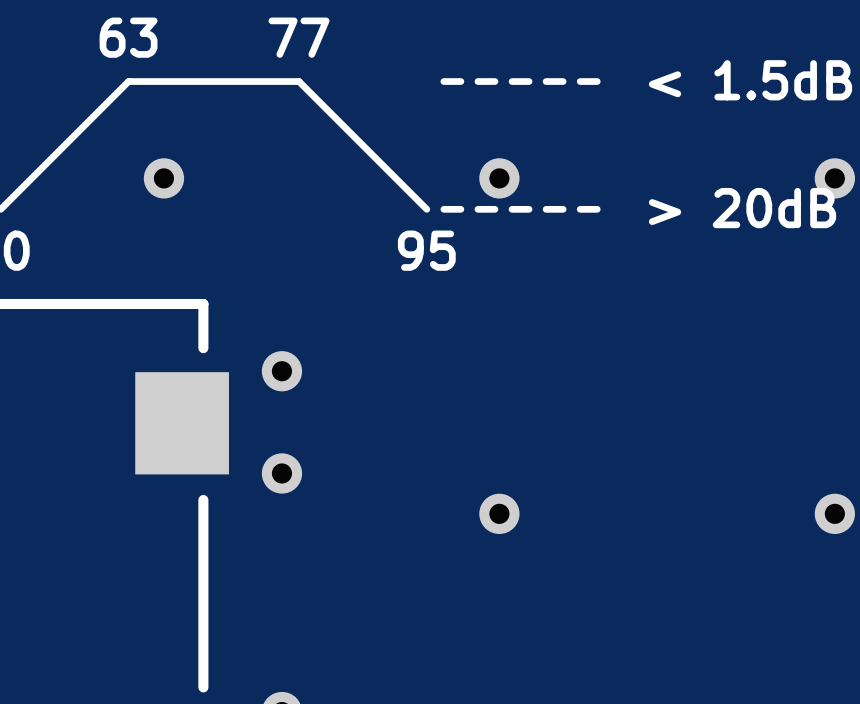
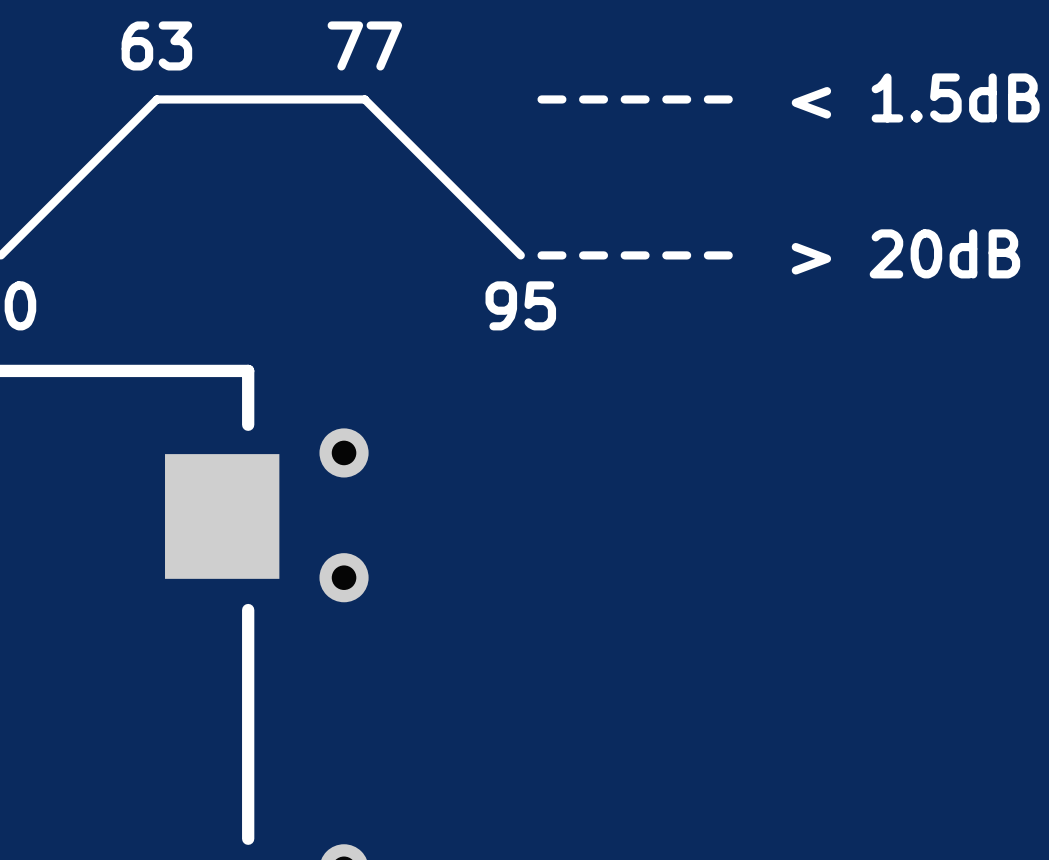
part: (163, 178) -> none
part: (499, 178) -> none
part: (834, 178) -> none
part: (499, 513) -> none
part: (834, 513) -> none

